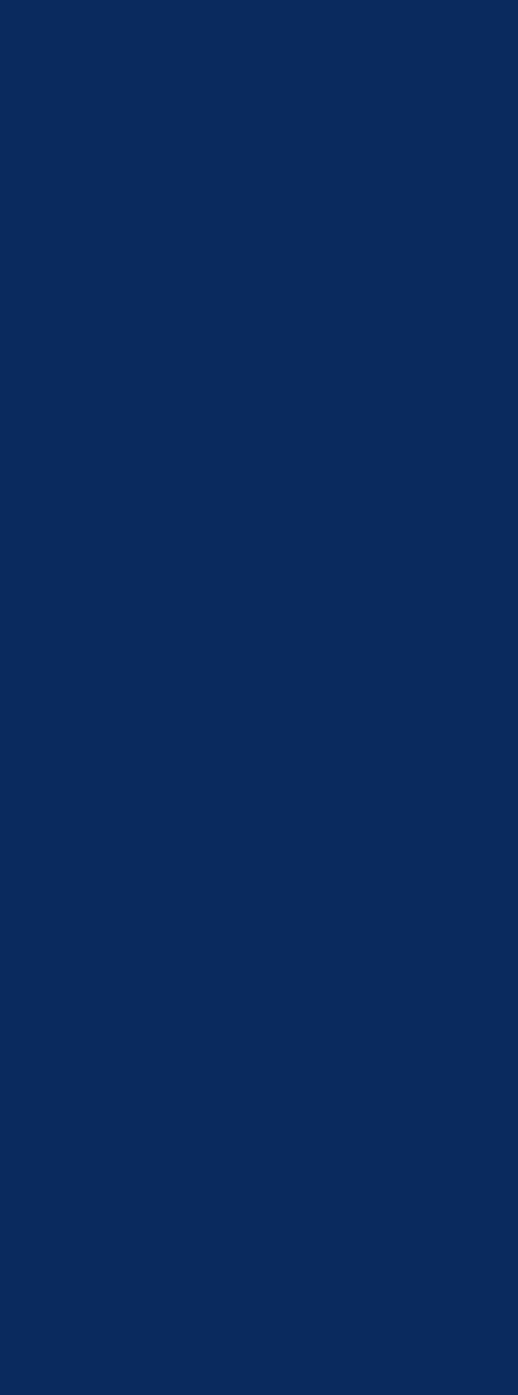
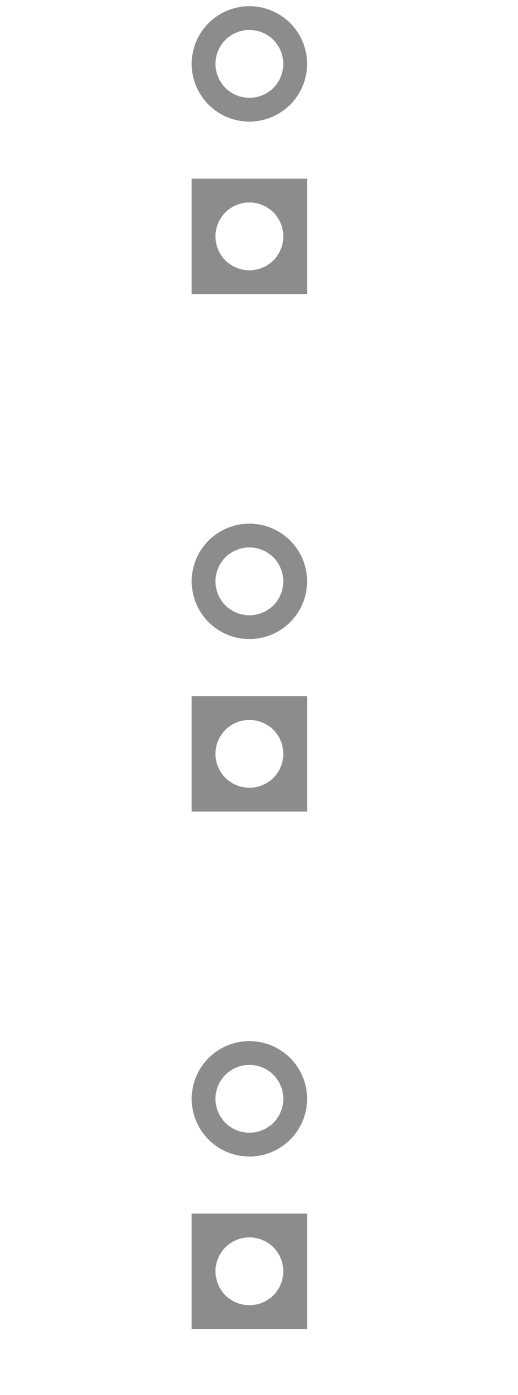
part: none -> (249, 150)
part: none -> (249, 667)
part: none -> (249, 1185)

